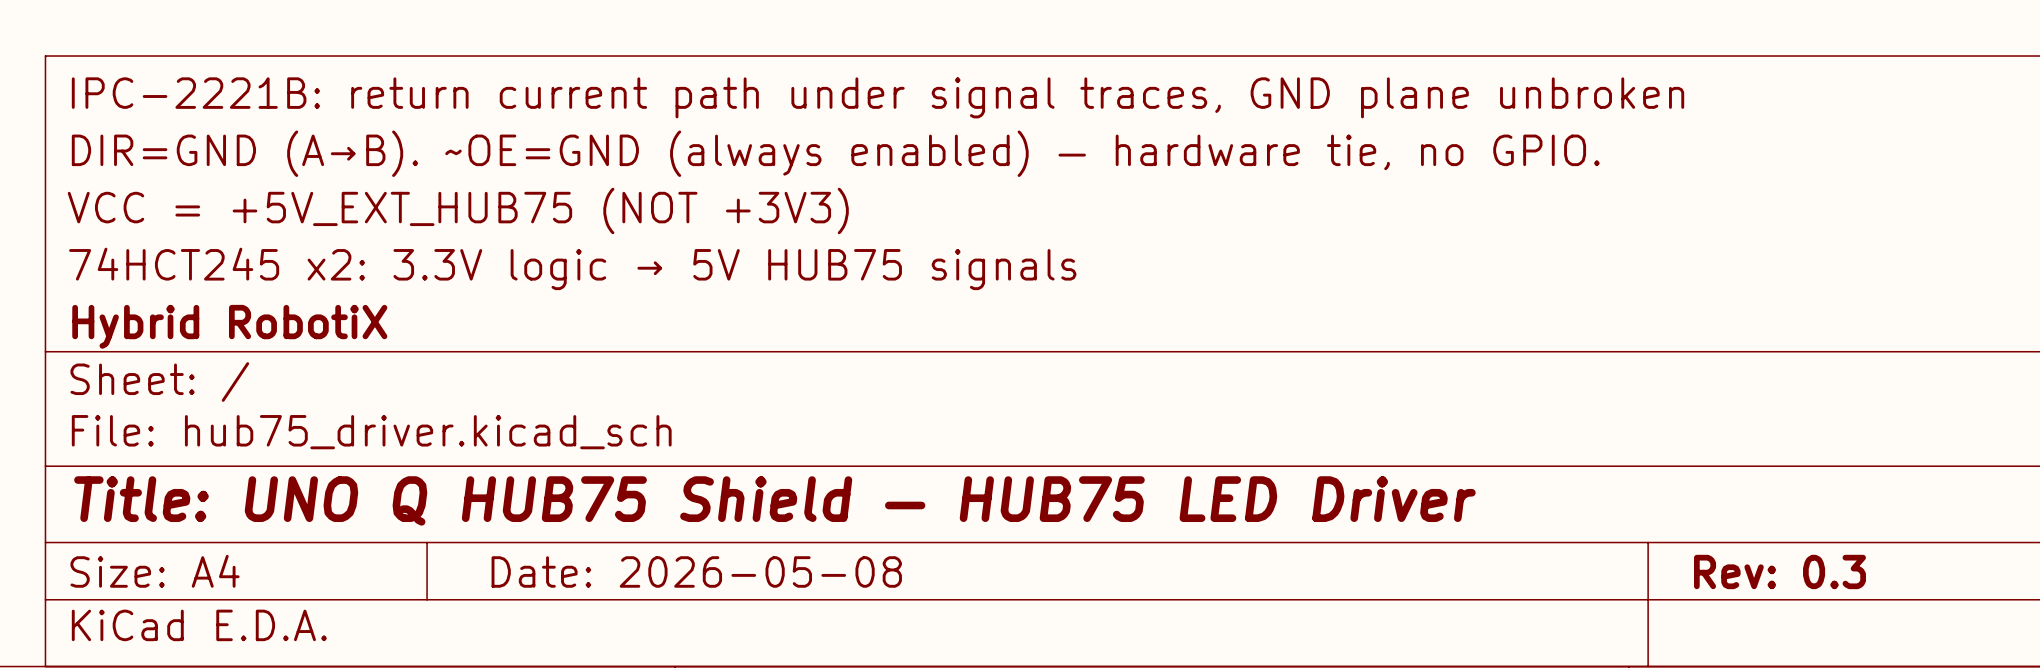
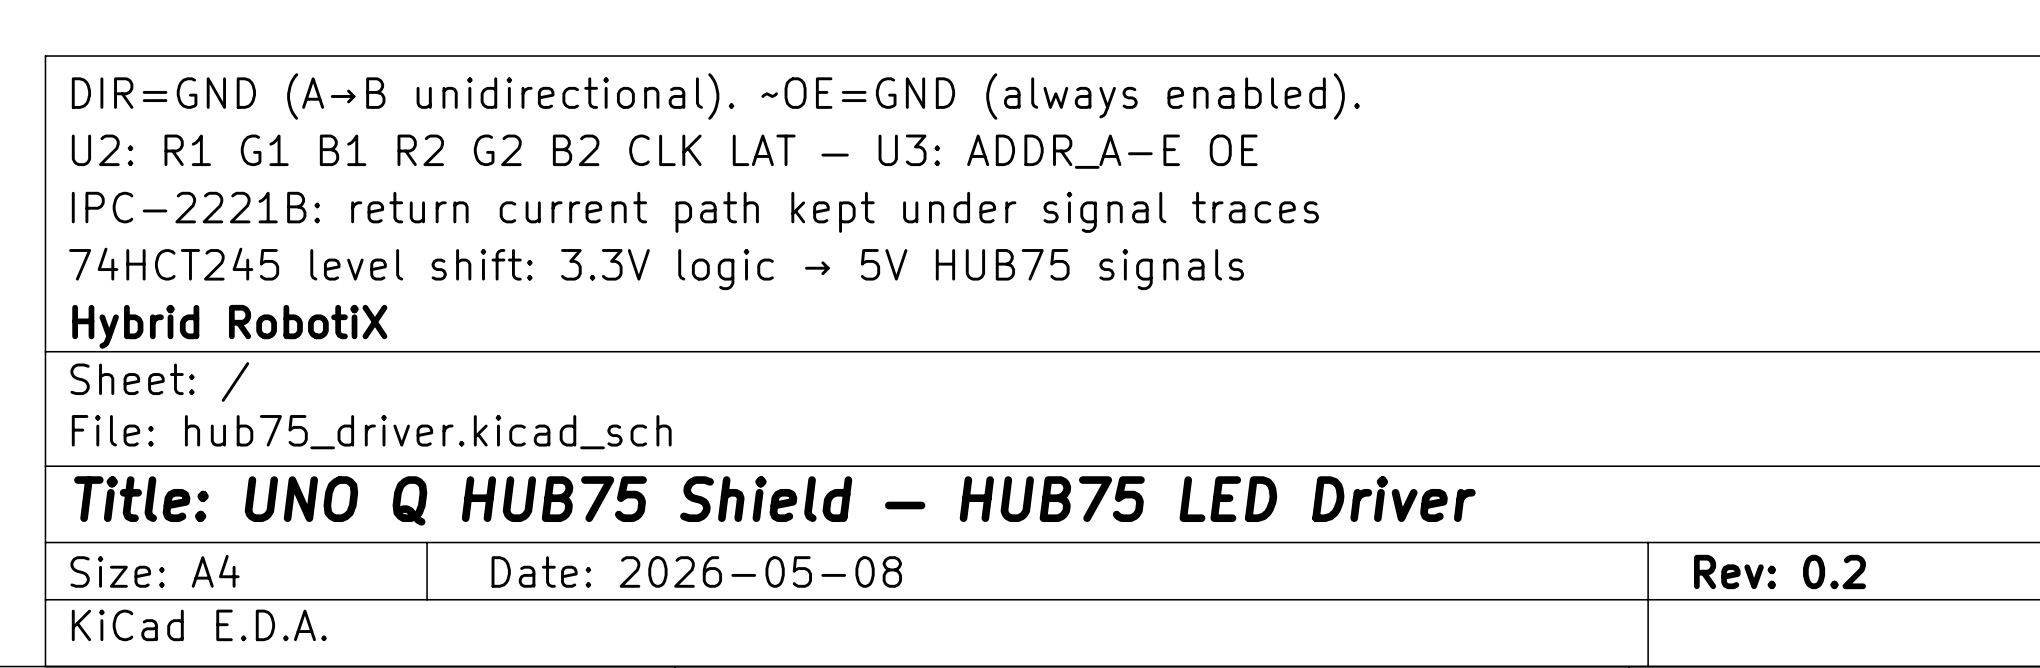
title block: IPC-2221B: return current path under signal traces, GND plane unbroken (878, 97) -> DIR=GND (A→B unidirectional). ~OE=GND (always enabled). (715, 96)
title block: DIR=GND (A→B). ~OE=GND (always enabled) — hardware tie, no GPIO. (835, 153) -> U2: R1 G1 B1 R2 G2 B2 CLK LAT — U3: ADDR_A-E OE (664, 151)
title block: VCC = +5V_EXT_HUB75 (NOT +3V3) (458, 210) -> IPC-2221B: return current path kept under signal traces (695, 212)
title block: 74HCT245 x2: 3.3V logic → 5V HUB75 signals (572, 268) -> 74HCT245 level shift: 3.3V logic → 5V HUB75 signals (656, 268)
title block: Rev: 0.3 (1779, 571) -> Rev: 0.2 (1779, 571)

